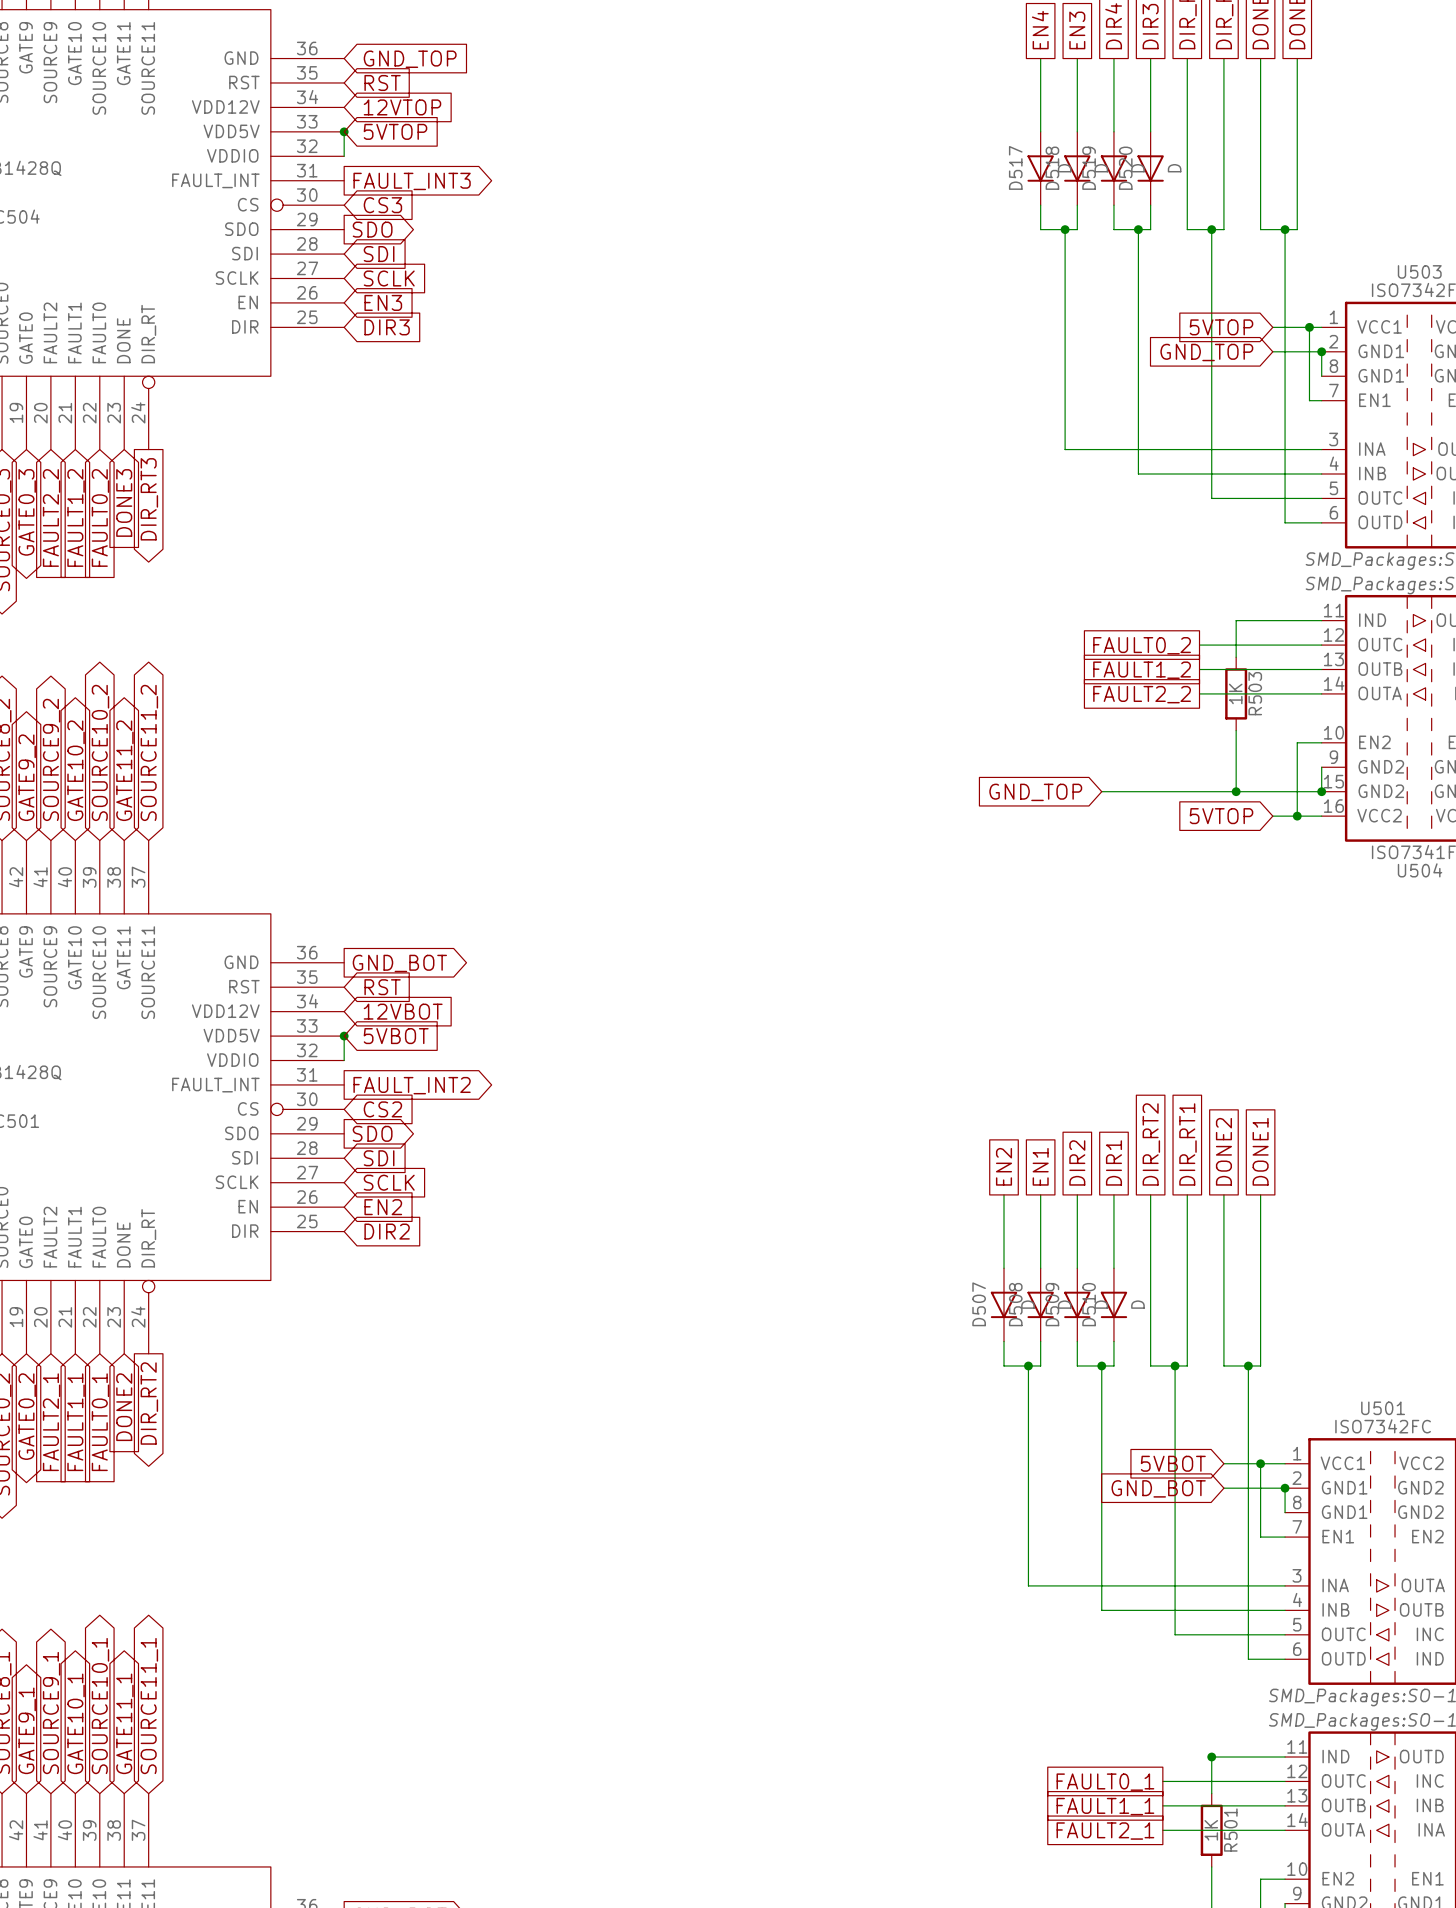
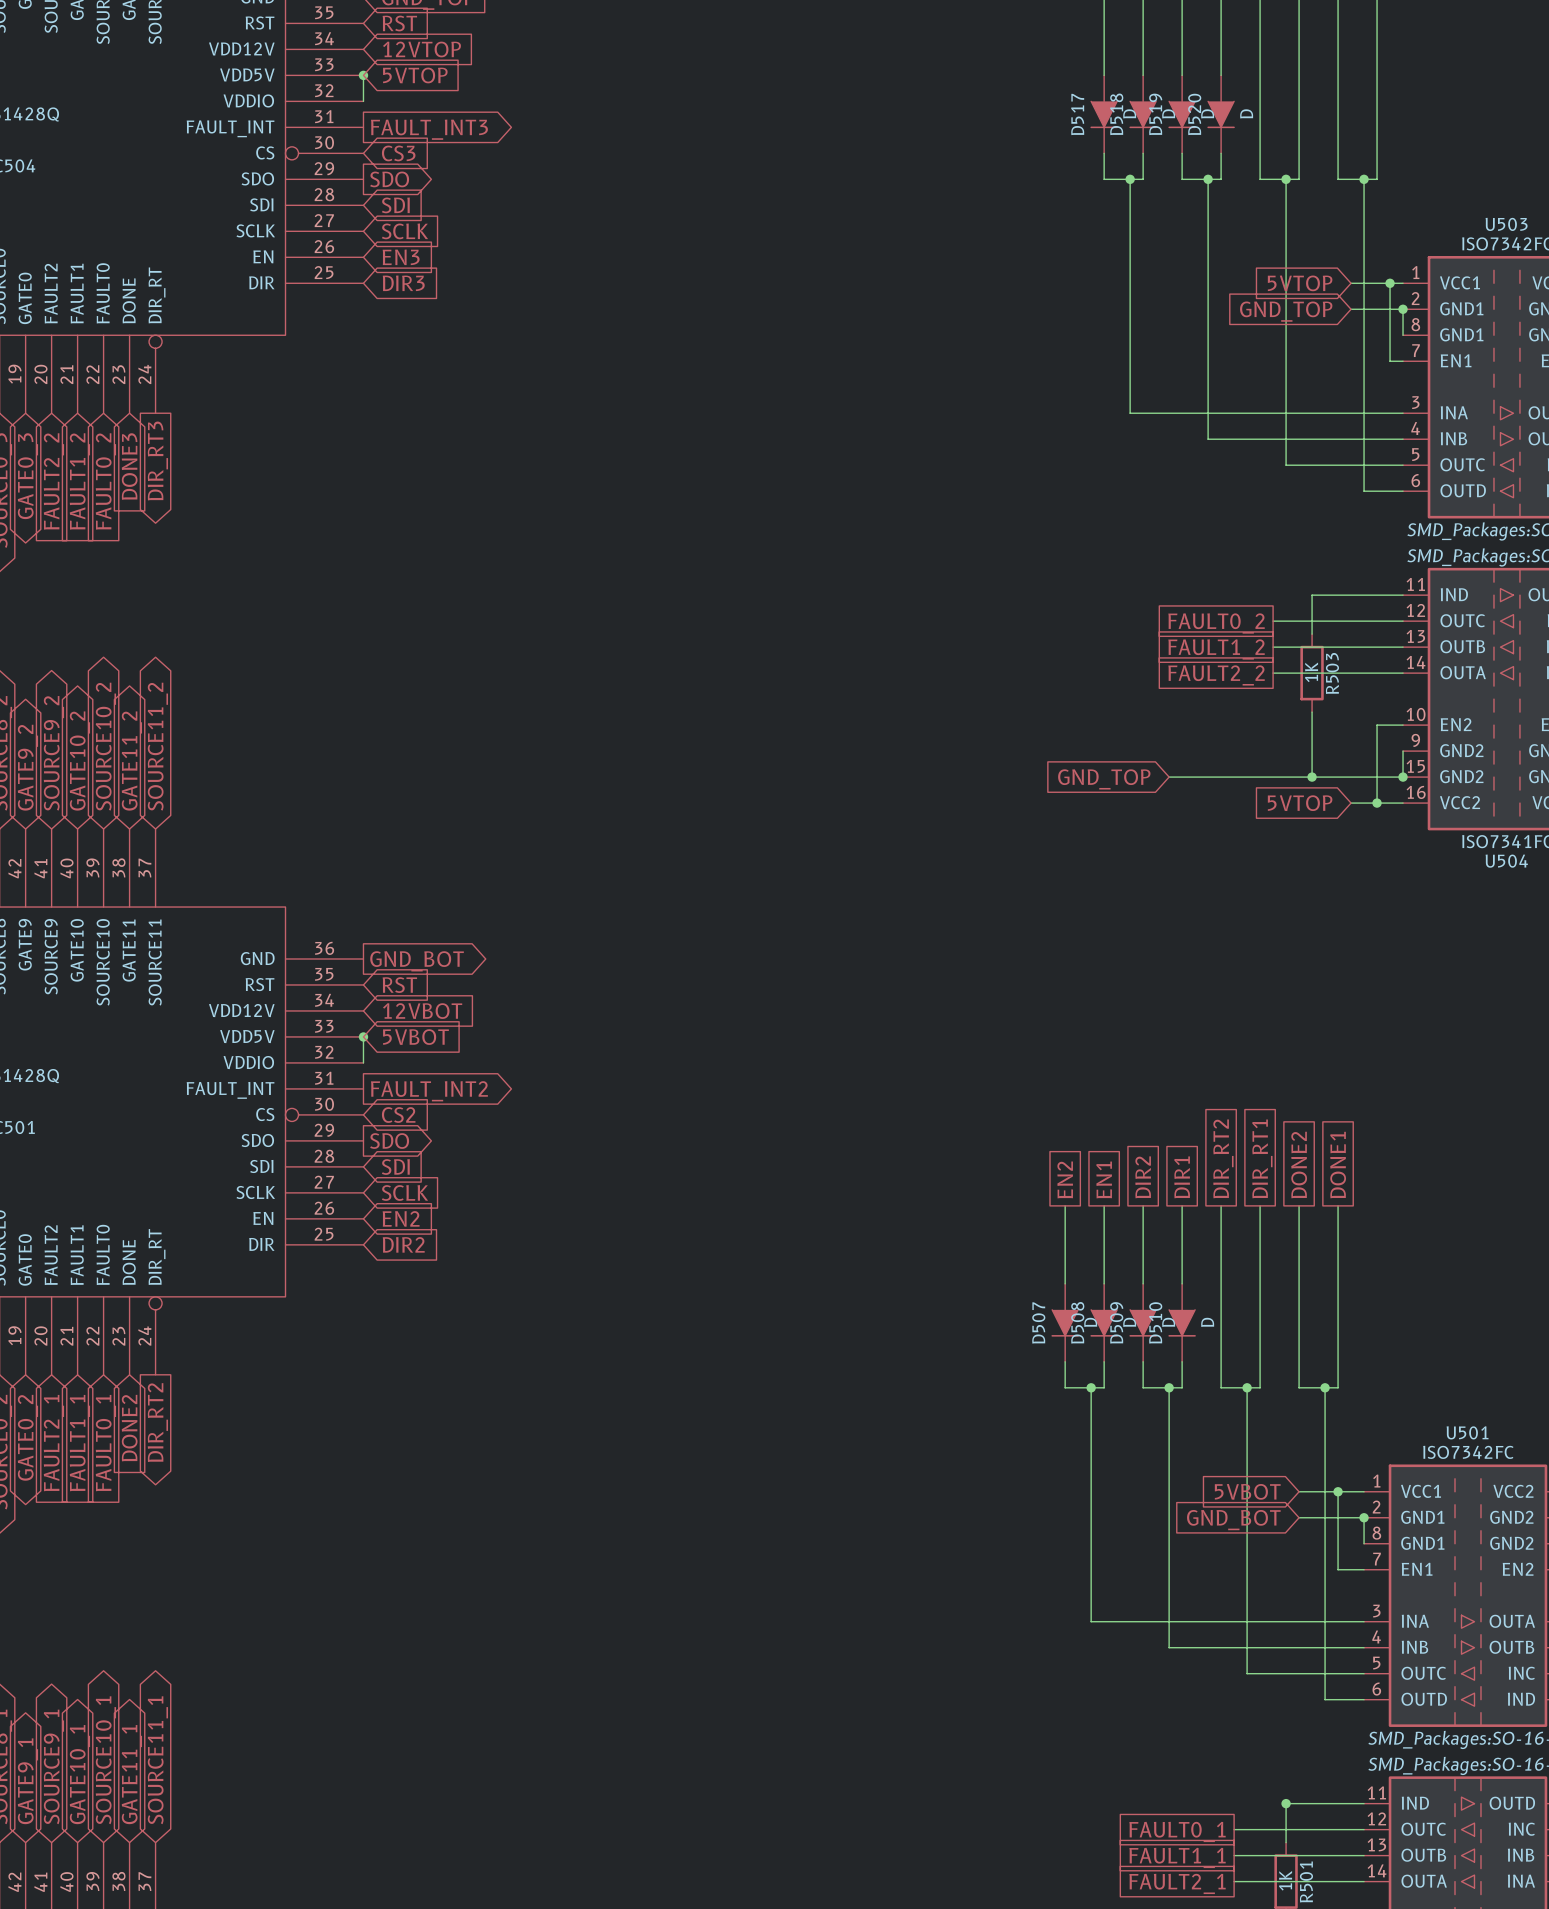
D517 symbol: [1027, 131, 1054, 206] -> [1090, 75, 1118, 154]
D518 symbol: [1064, 131, 1091, 206] -> [1129, 75, 1157, 154]
D519 symbol: [1100, 131, 1128, 206] -> [1168, 75, 1196, 154]
D520 symbol: [1137, 131, 1164, 206] -> [1207, 75, 1235, 154]
D507 symbol: [990, 1268, 1018, 1342] -> [1051, 1283, 1079, 1362]
D508 symbol: [1027, 1268, 1054, 1342] -> [1090, 1283, 1118, 1362]
D509 symbol: [1064, 1268, 1091, 1342] -> [1129, 1283, 1157, 1362]
D510 symbol: [1100, 1268, 1128, 1342] -> [1168, 1283, 1196, 1362]

